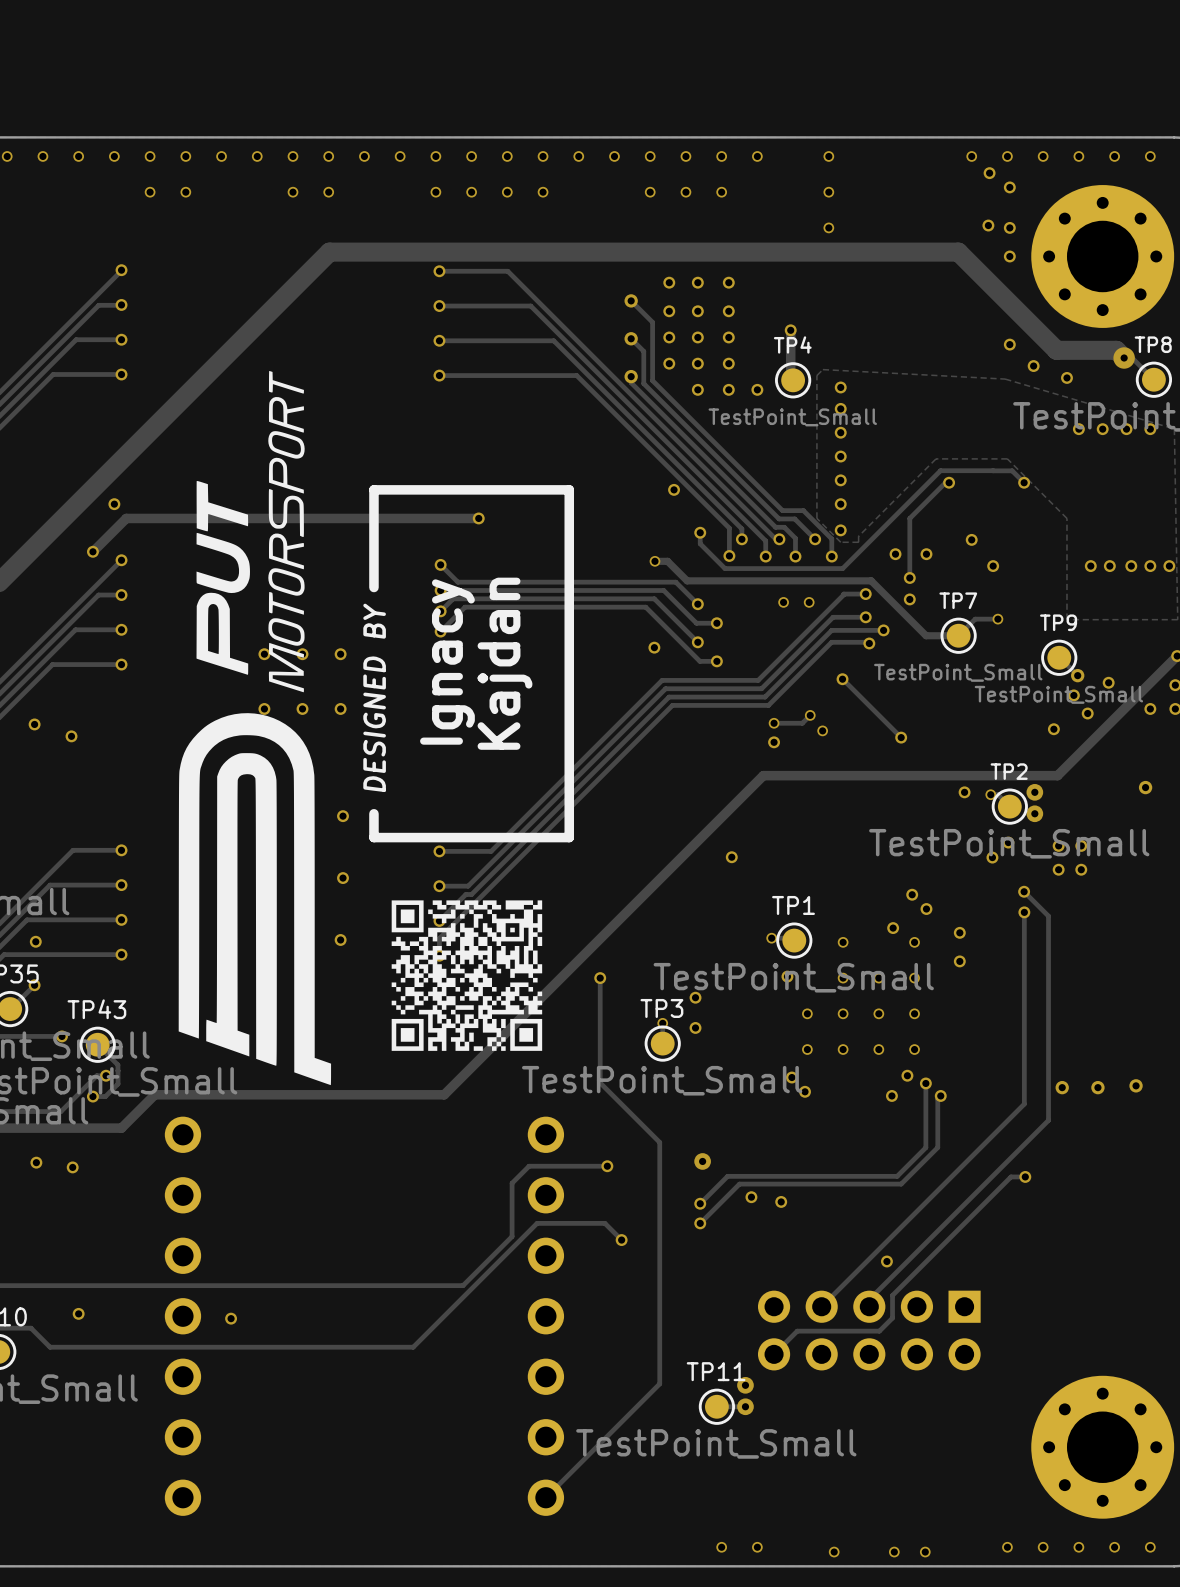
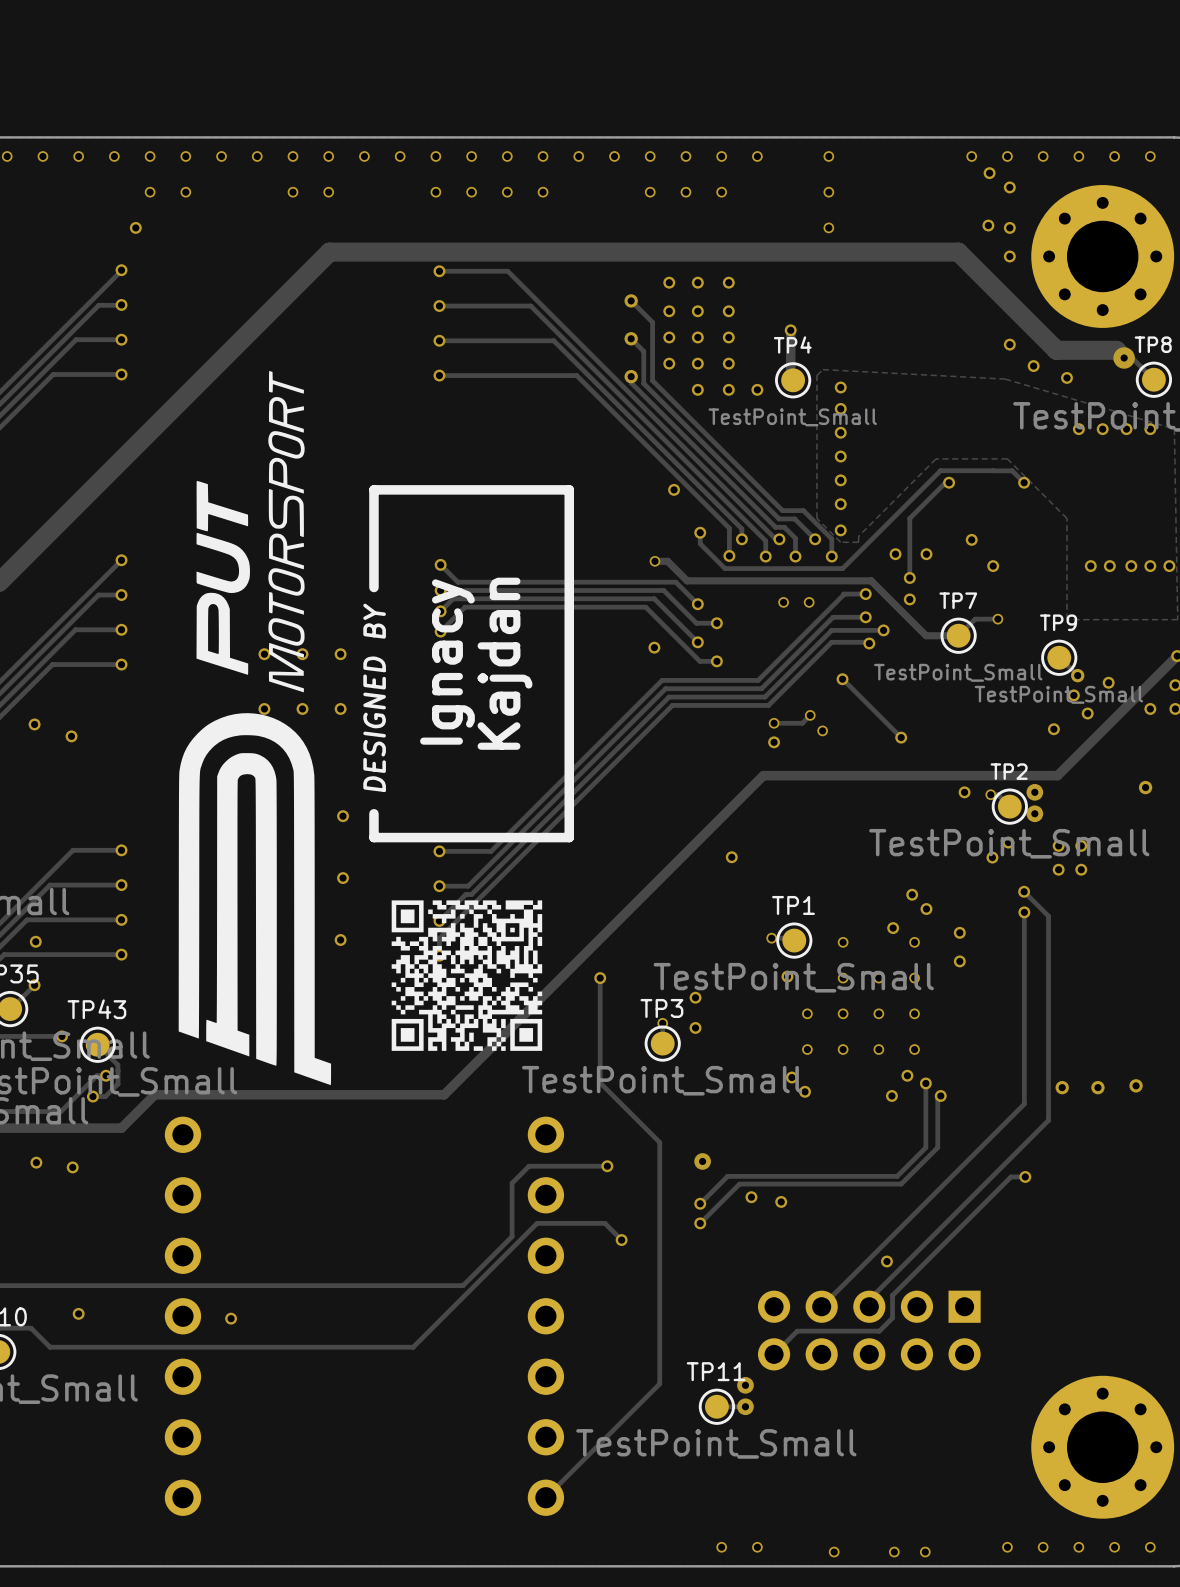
via: none -> (135, 227)
via: (114, 504) -> none
track: (478, 518) (126, 518) (92, 551) -> none
via: (478, 518) -> none
via: (92, 551) -> none

